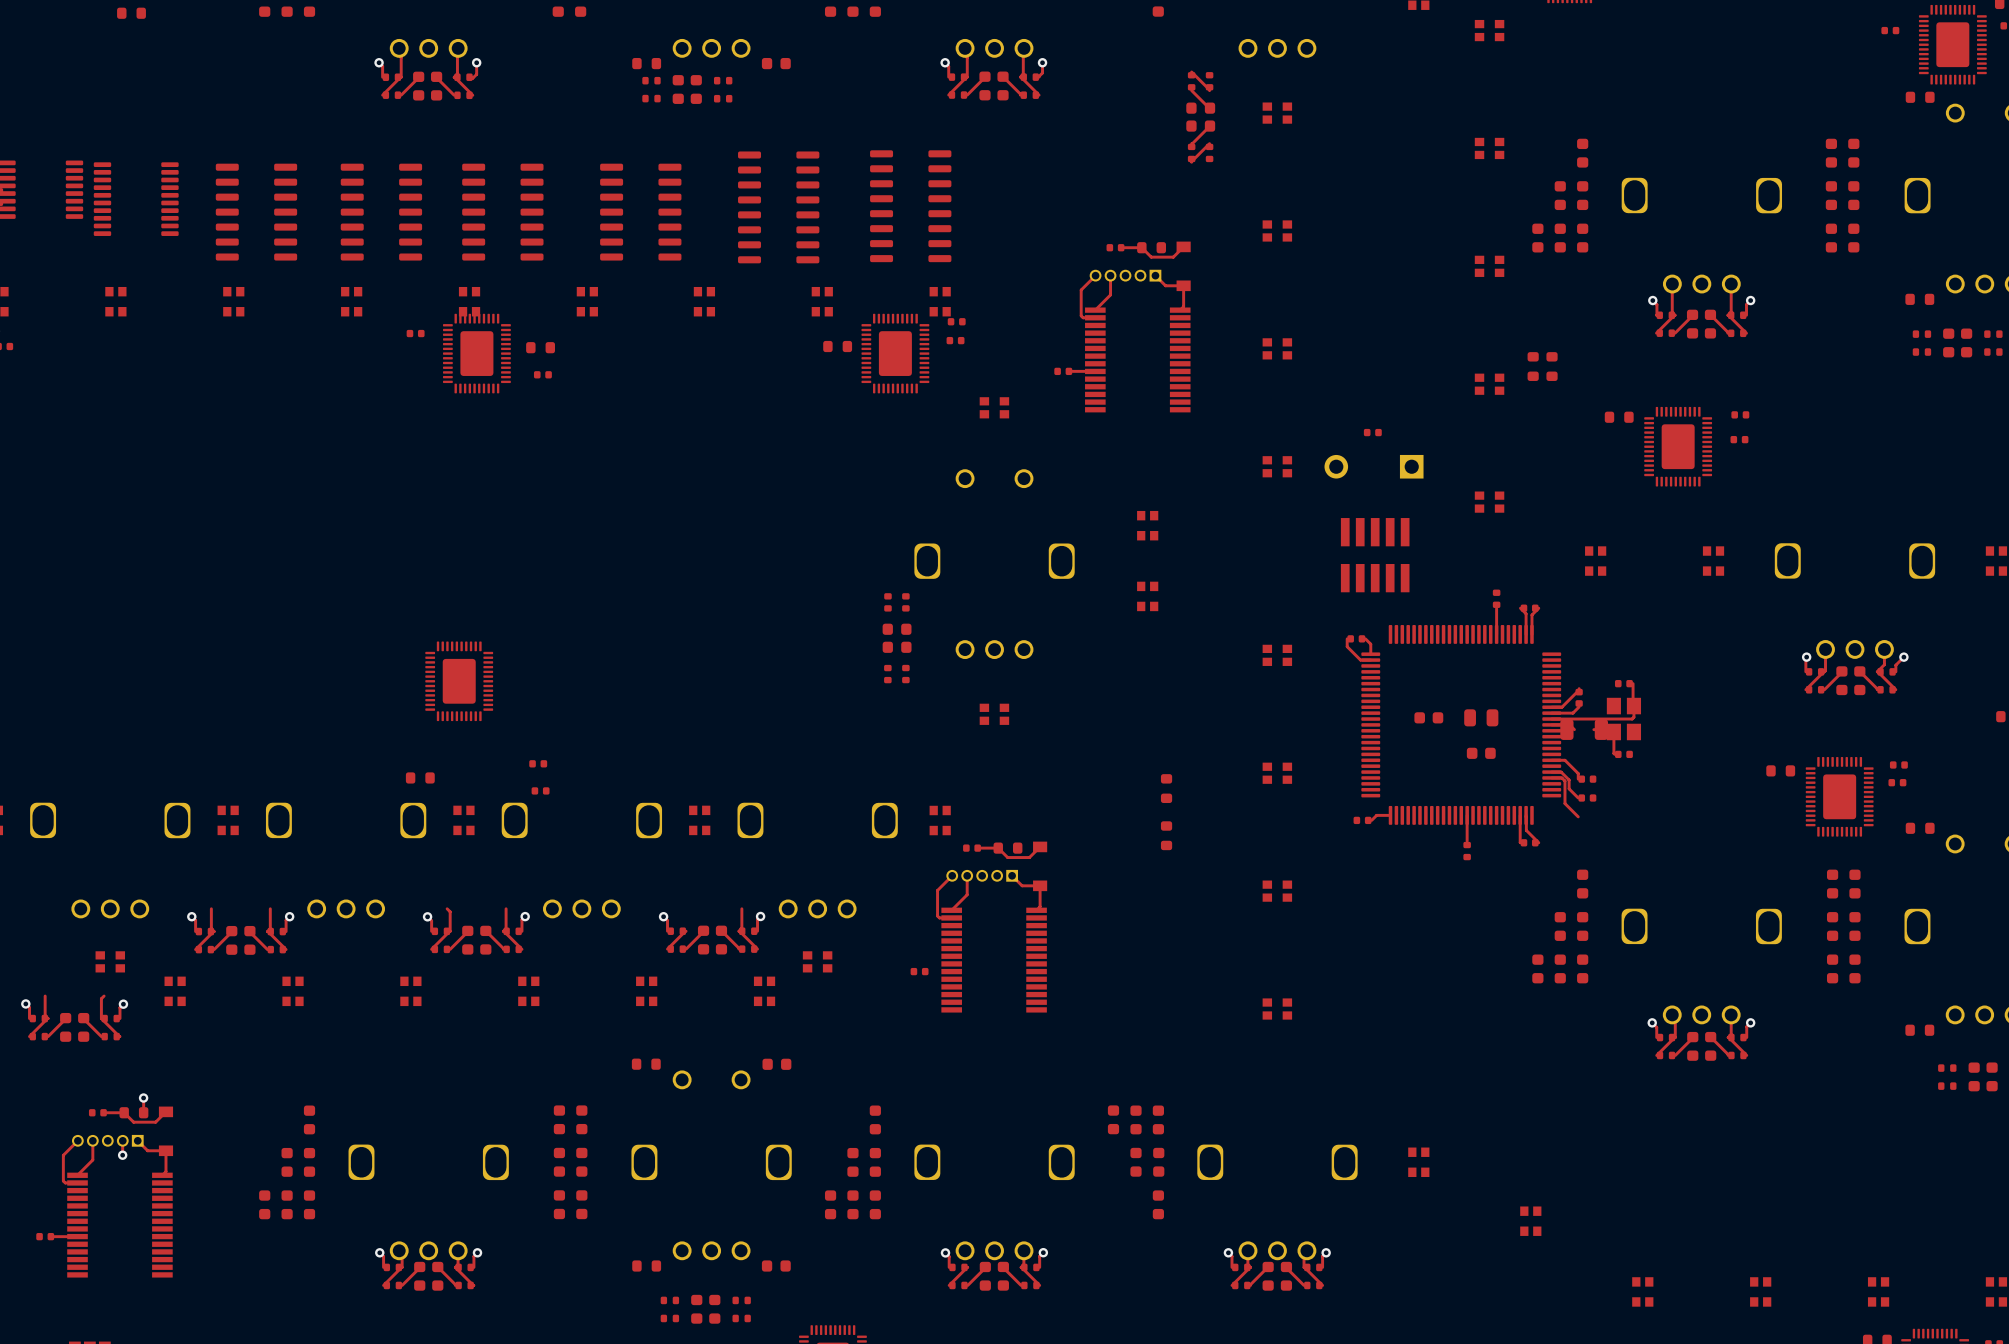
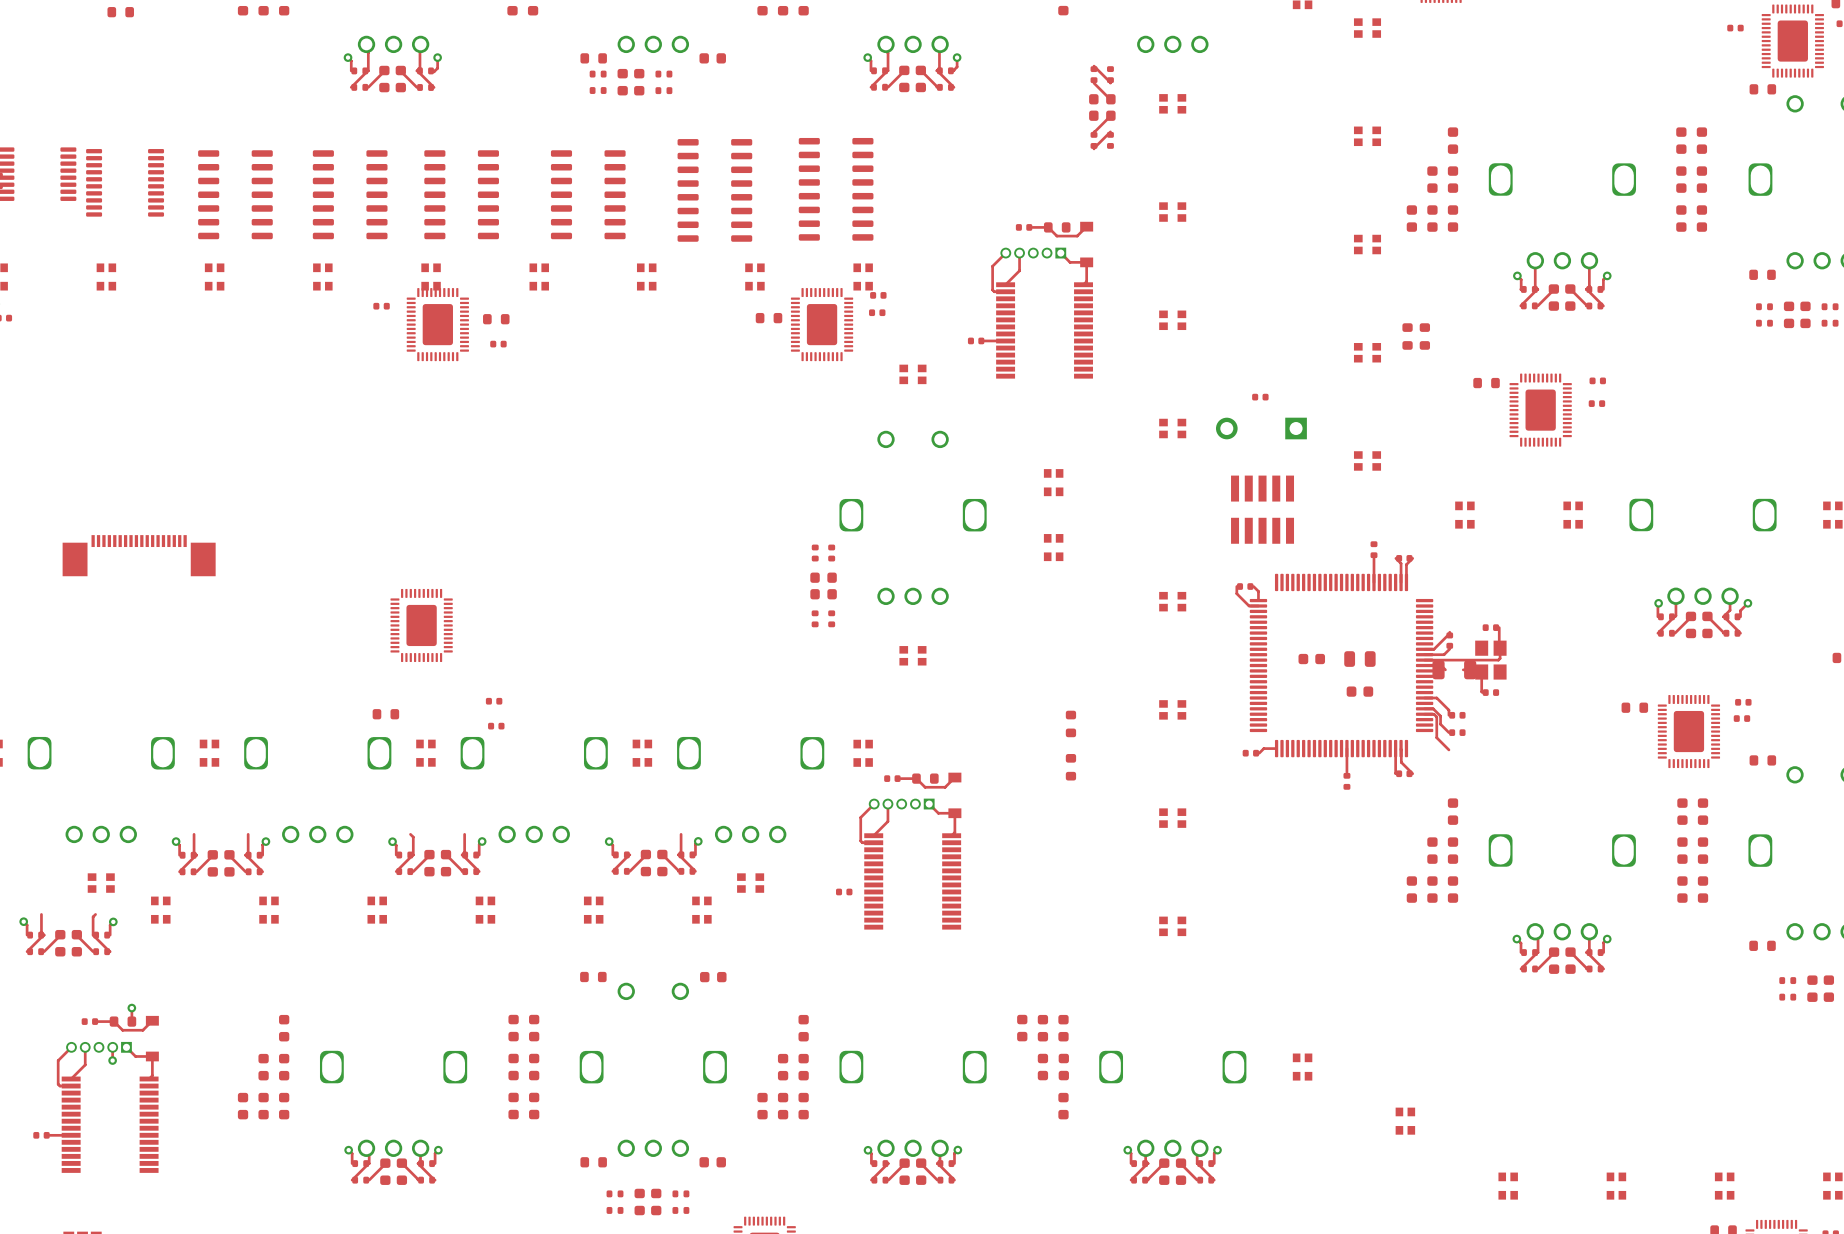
part: none -> (139, 555)

